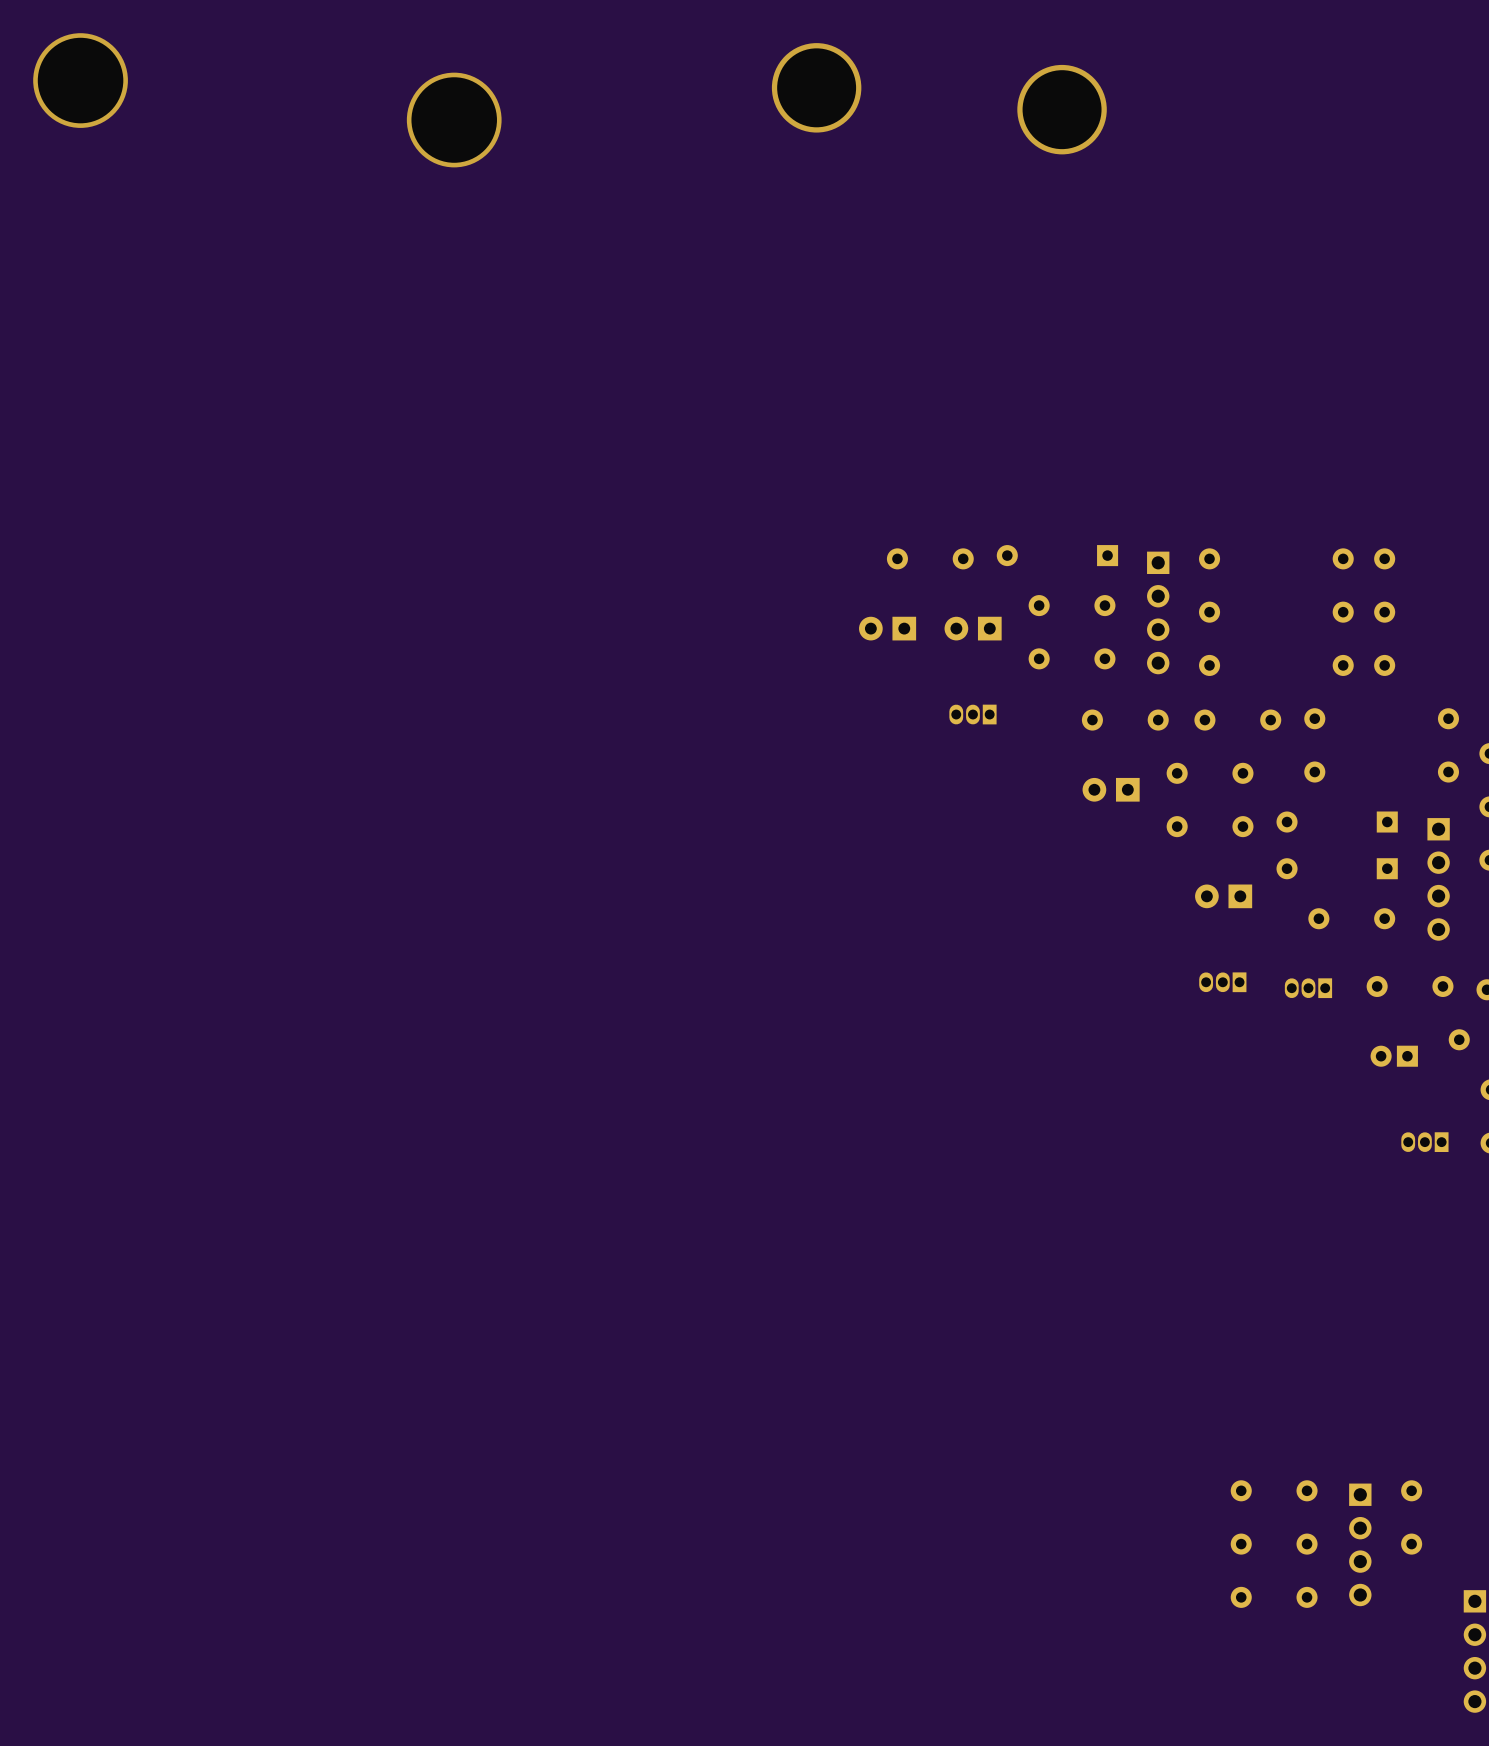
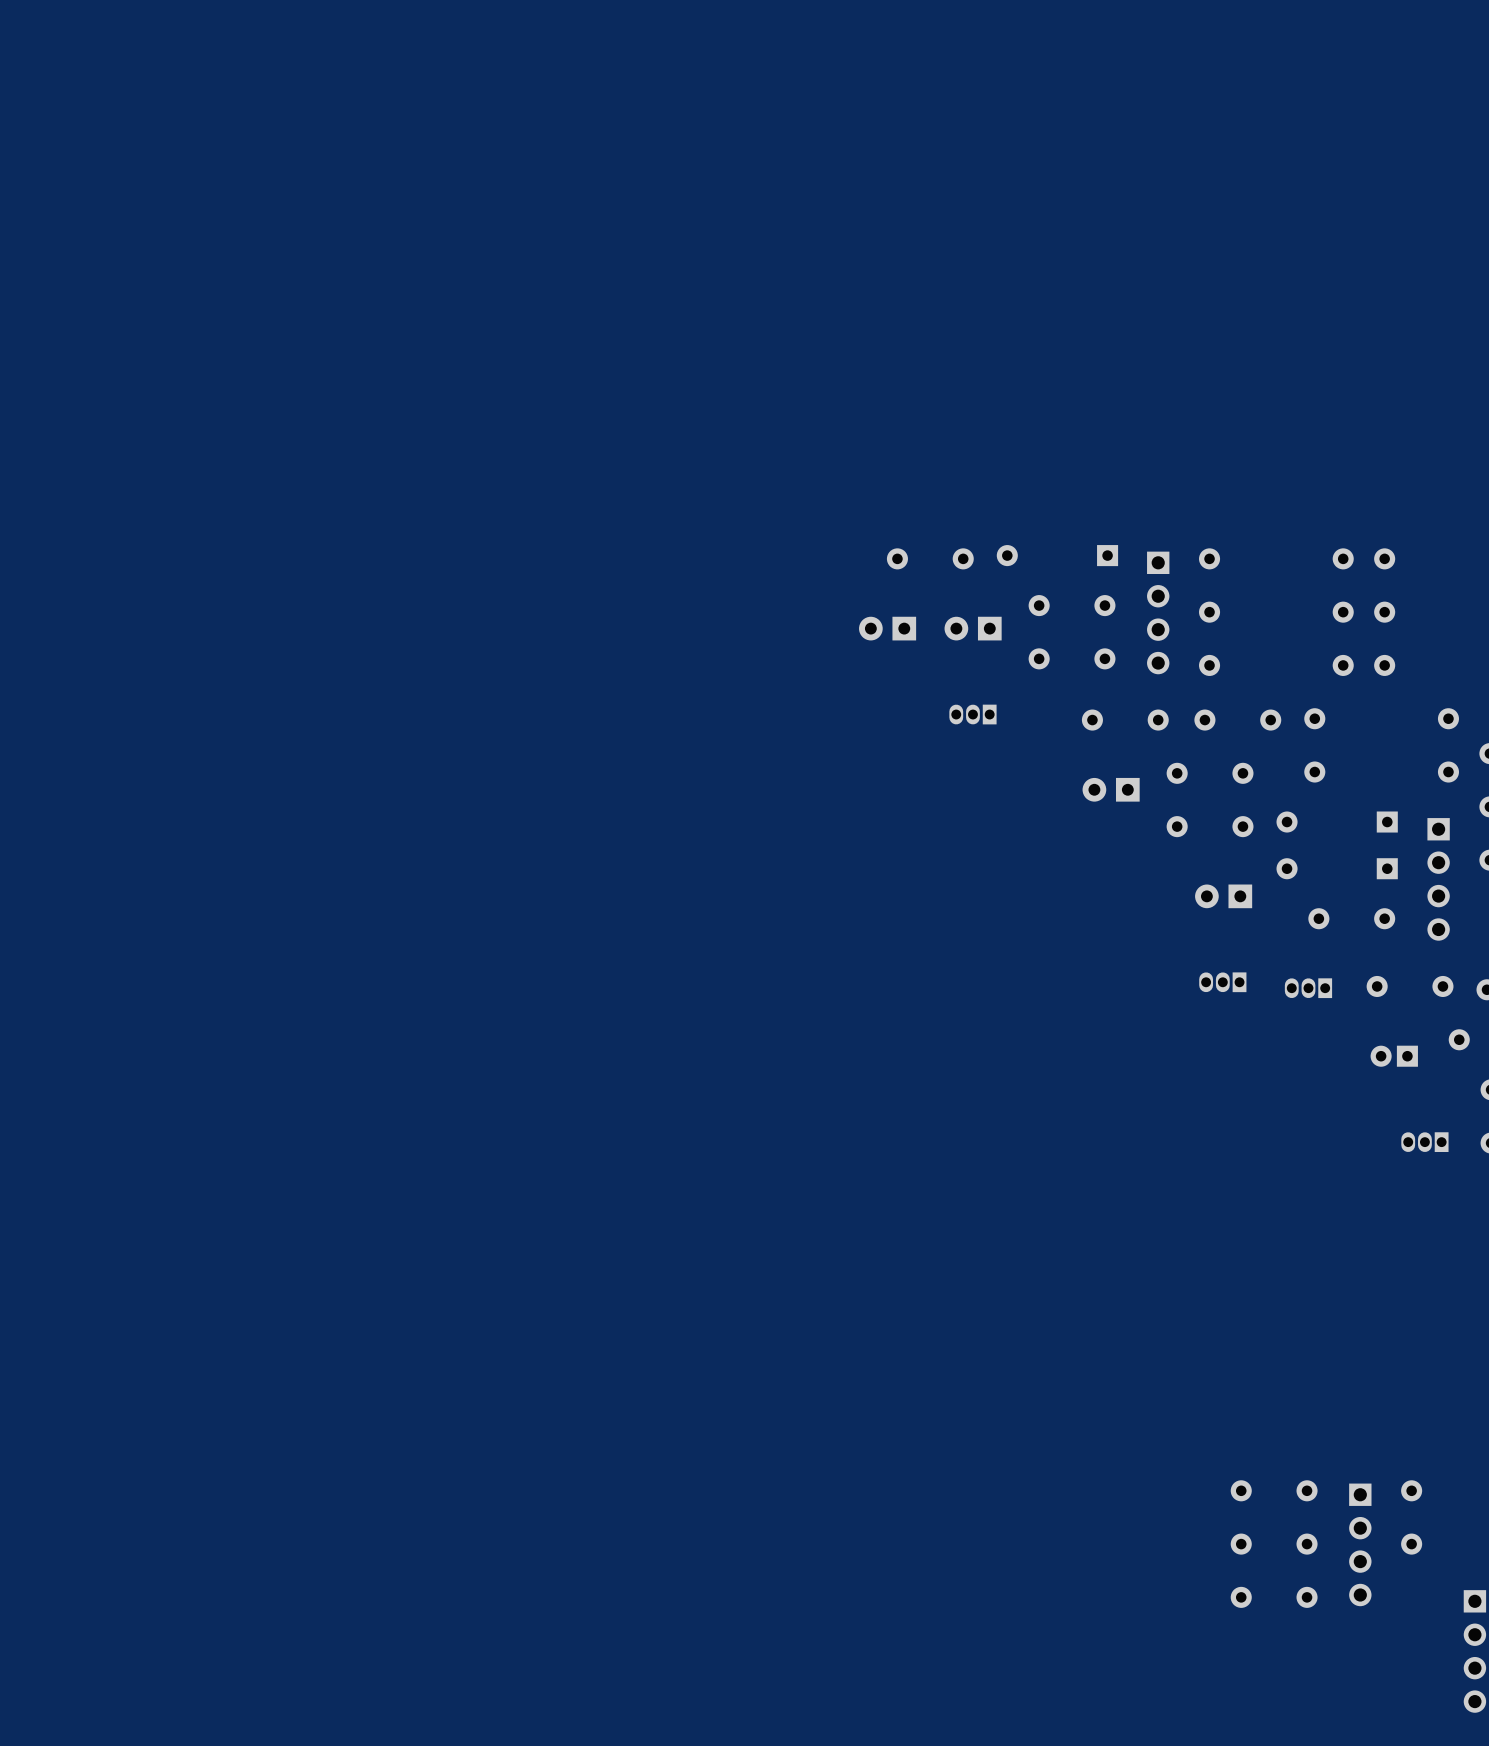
via: (80, 80) -> none
via: (816, 87) -> none
via: (1062, 109) -> none
via: (454, 120) -> none

